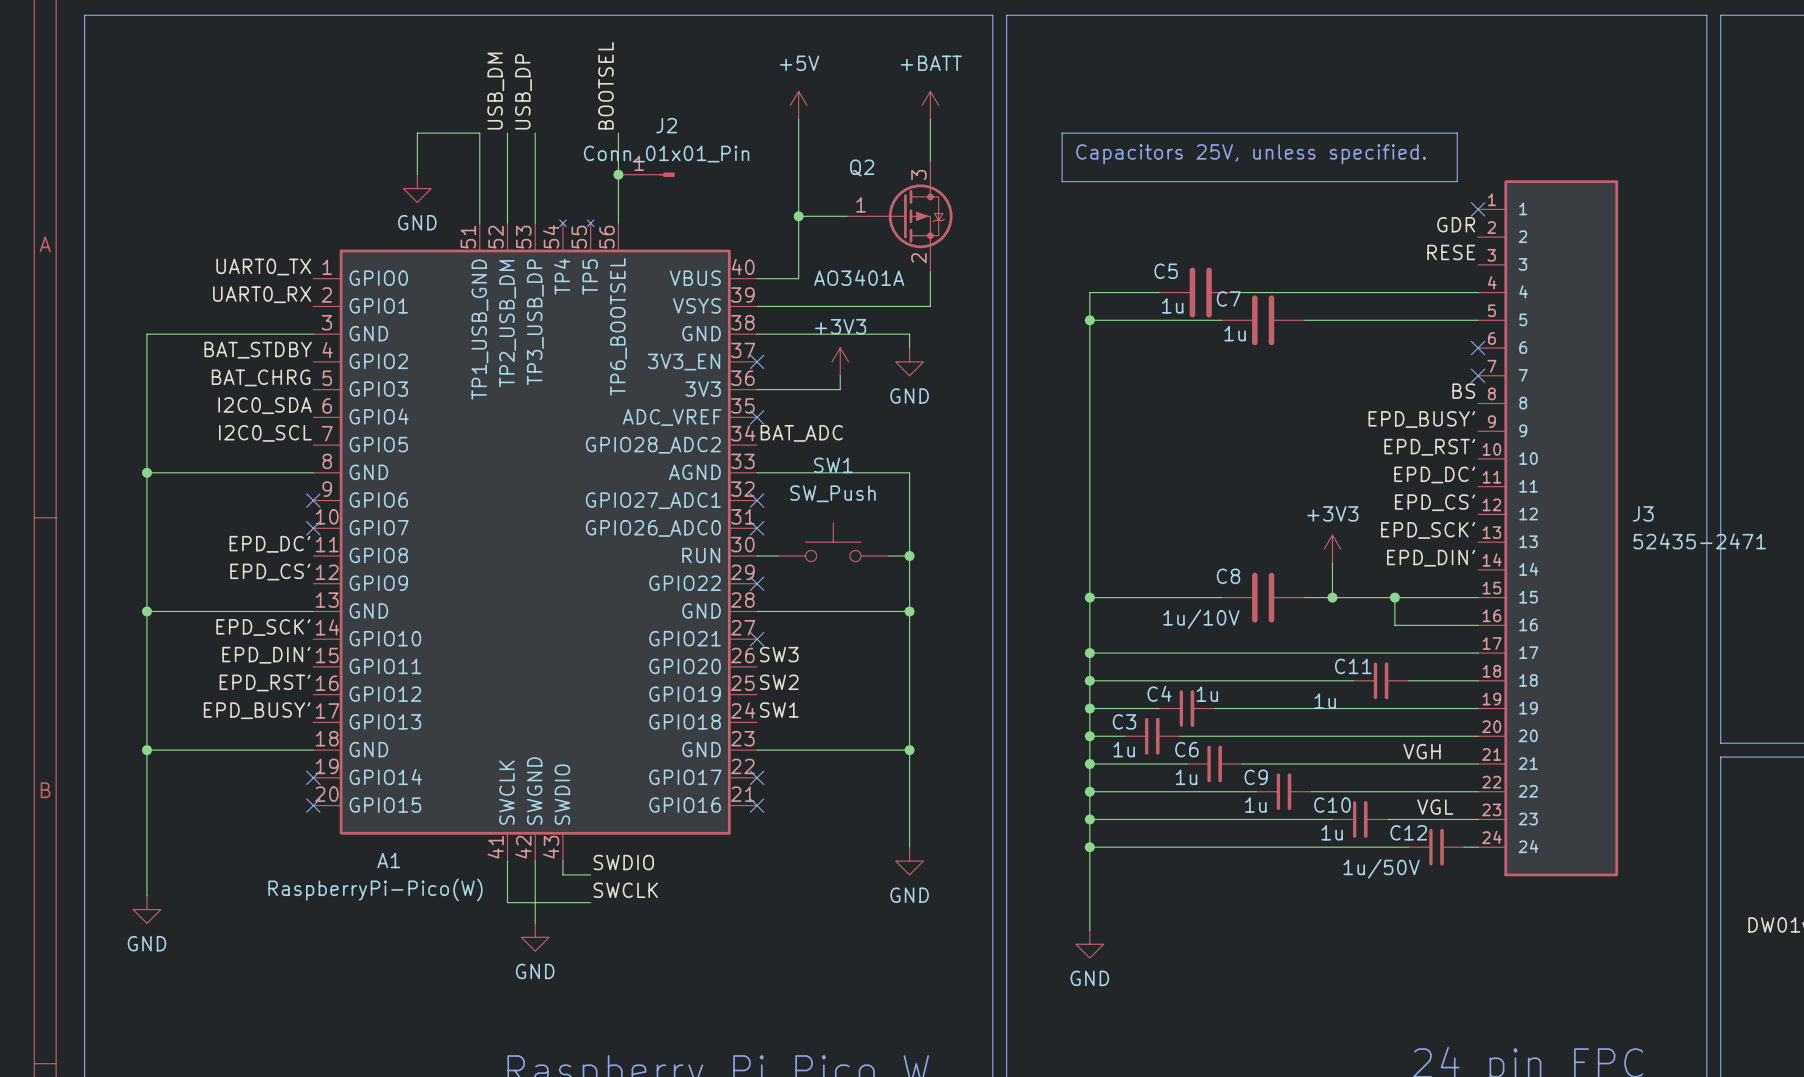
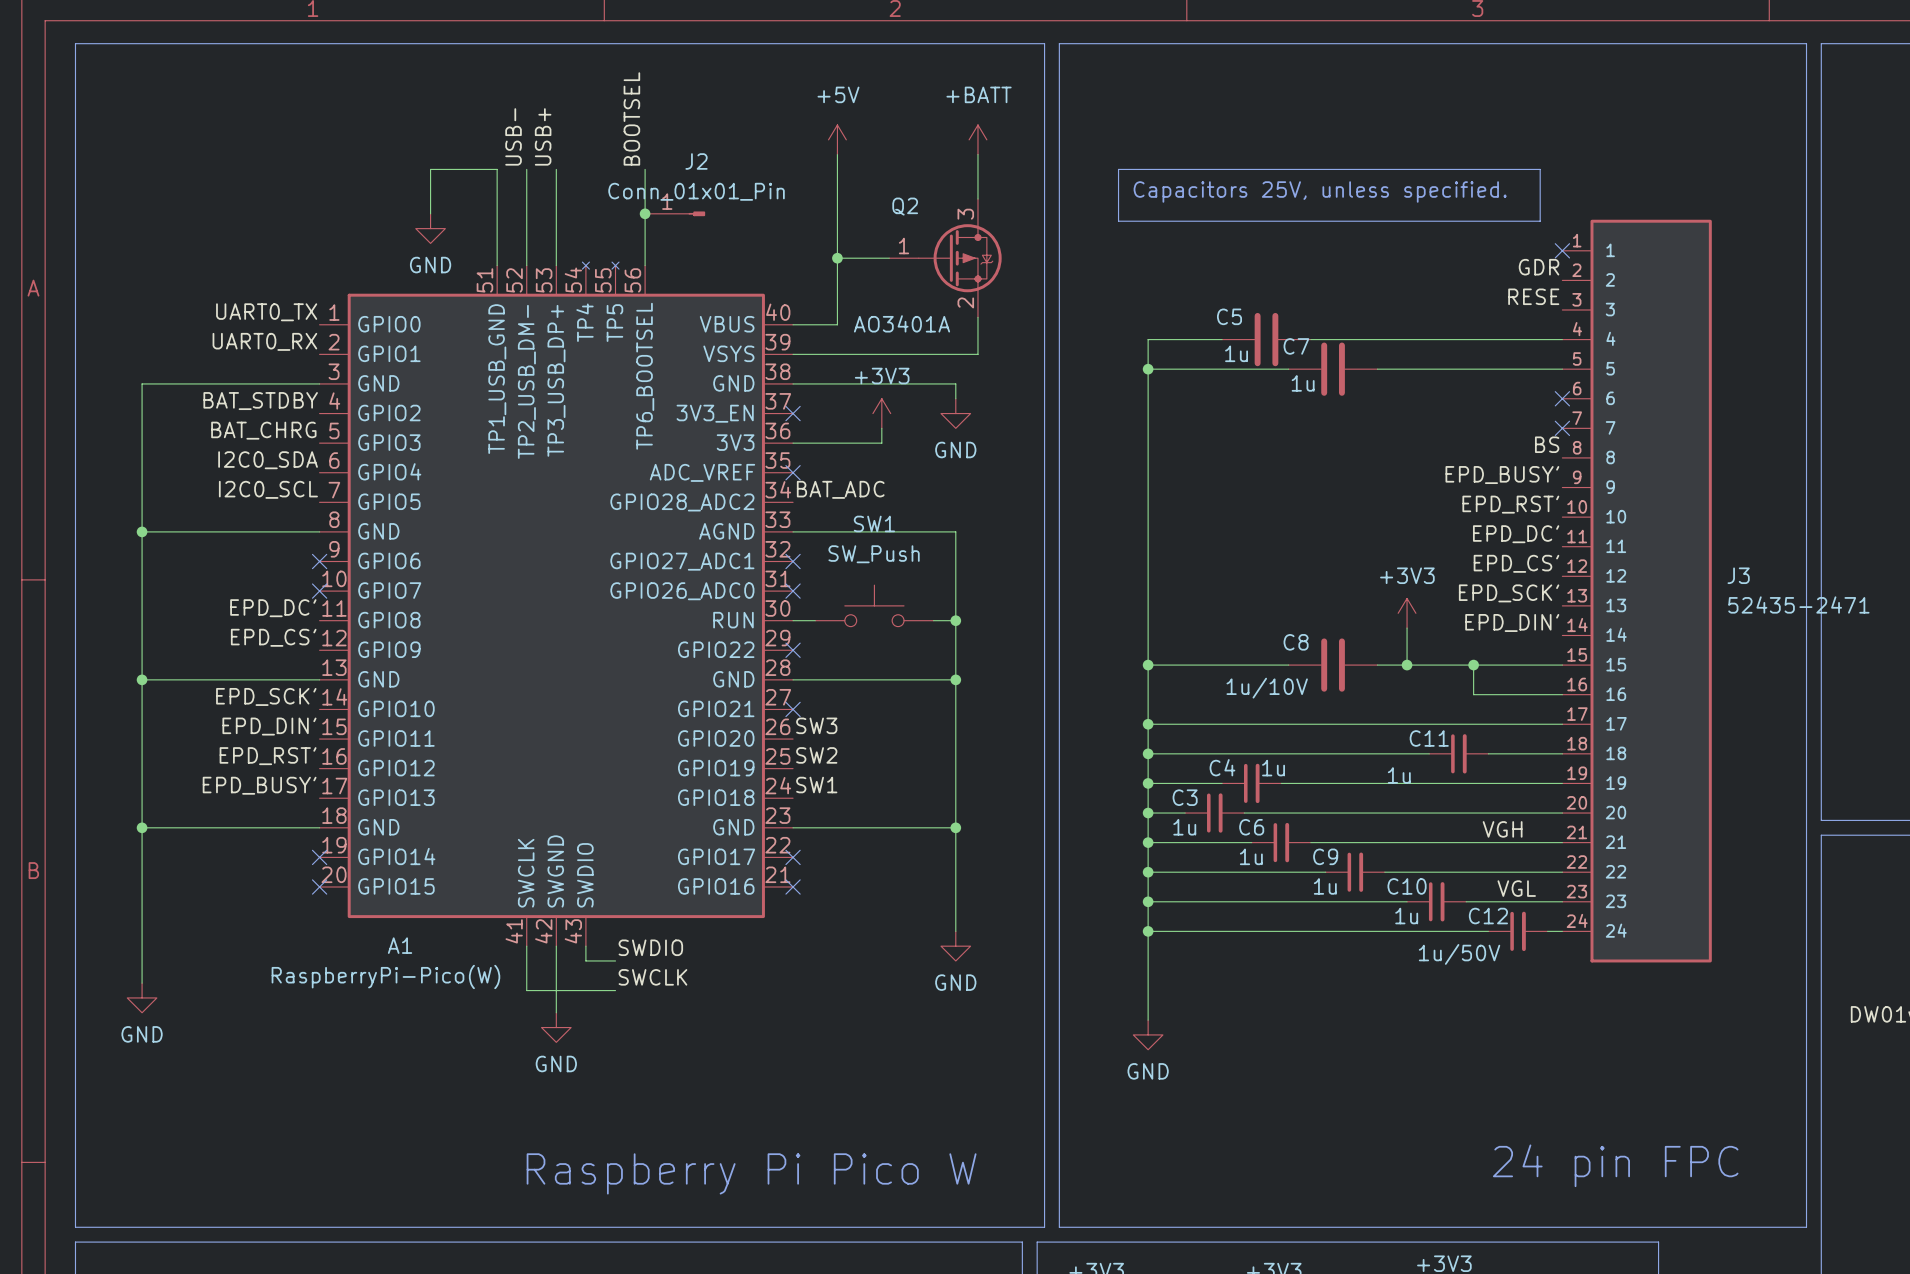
label: USB_DM (495, 91) -> USB- (513, 136)
label: USB_DP (523, 91) -> USB+ (543, 136)
A1 pin name: TP3_USB_DP (535, 322) -> TP3_USB_DP+ (556, 380)
A1 pin name: TP2_USB_DM (507, 323) -> TP2_USB_DM- (526, 381)

